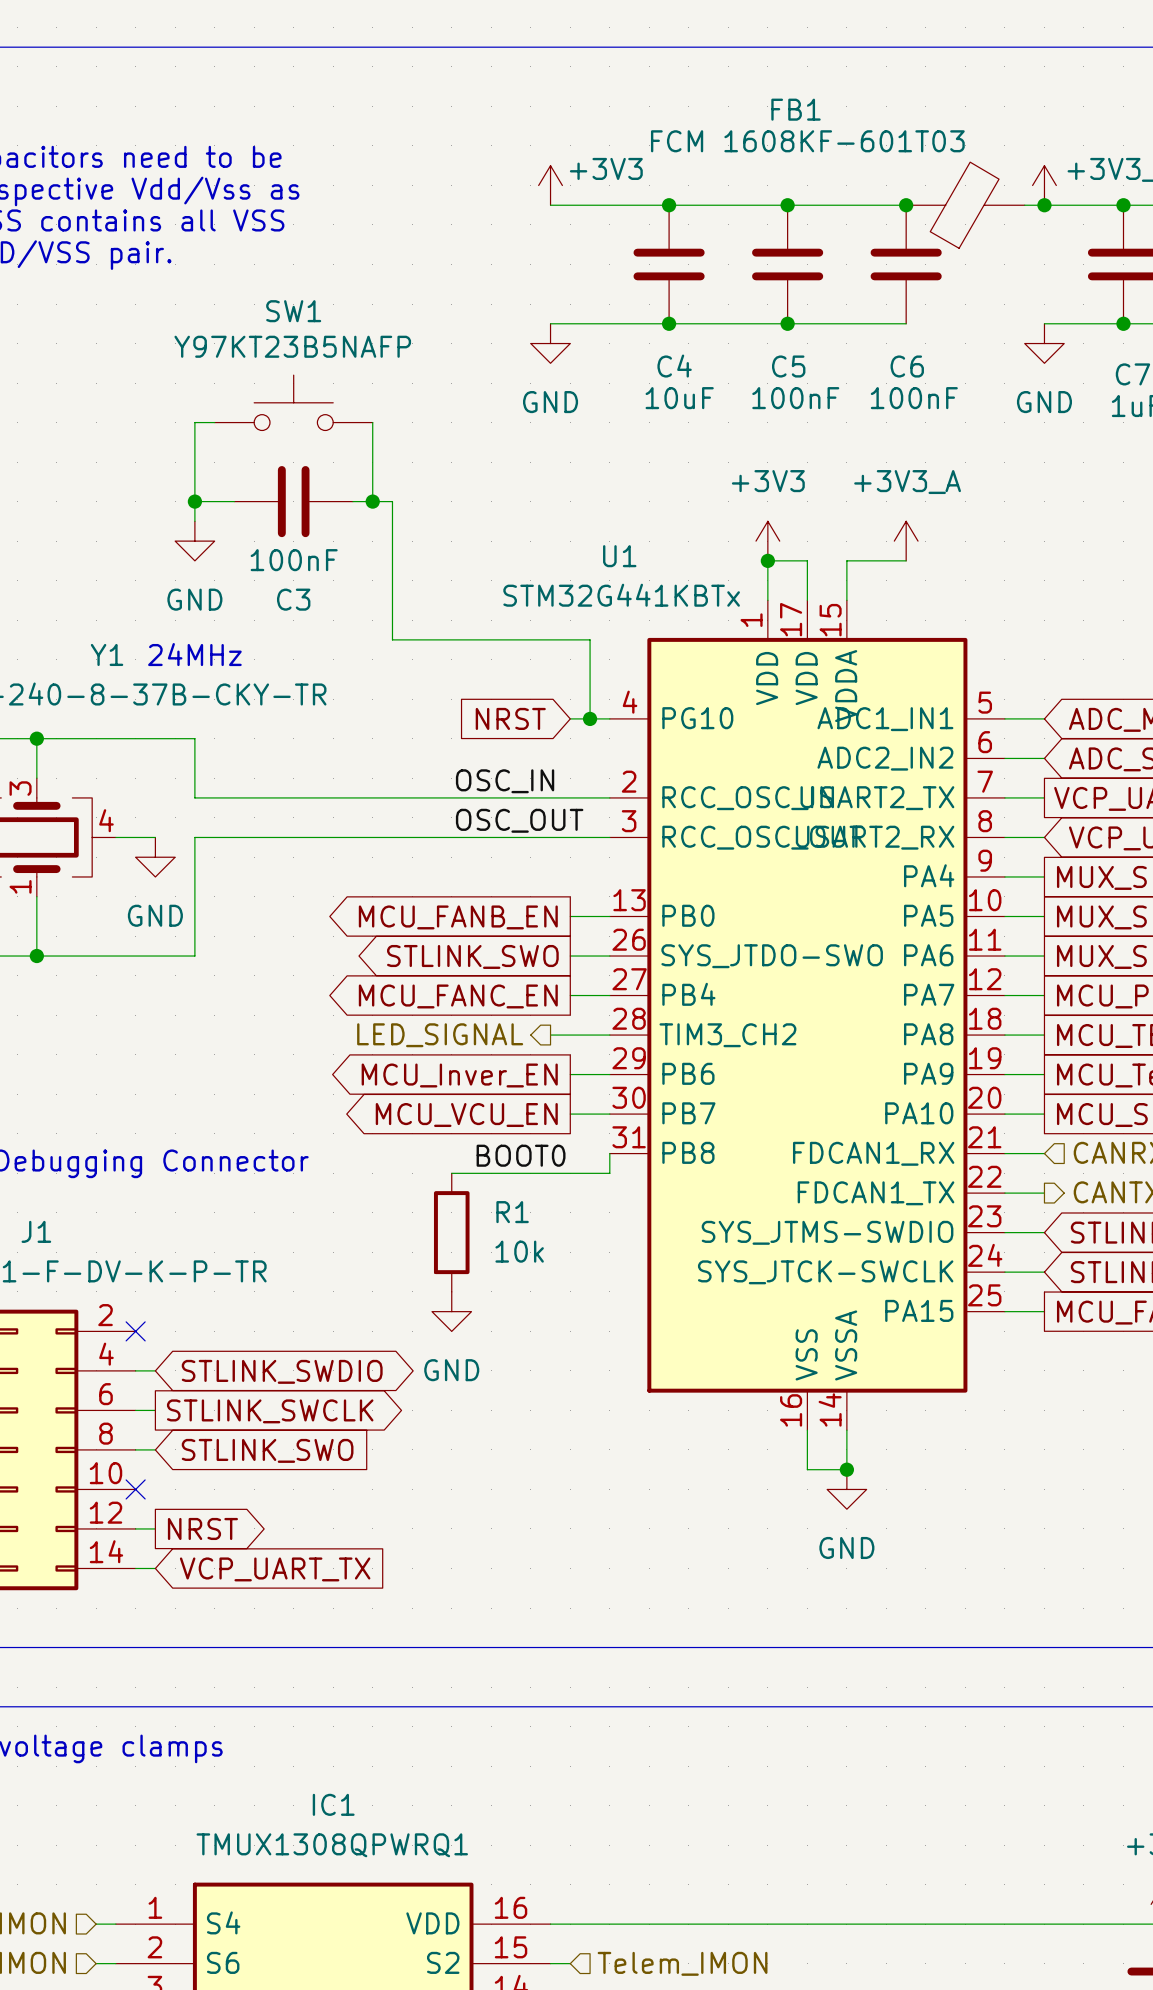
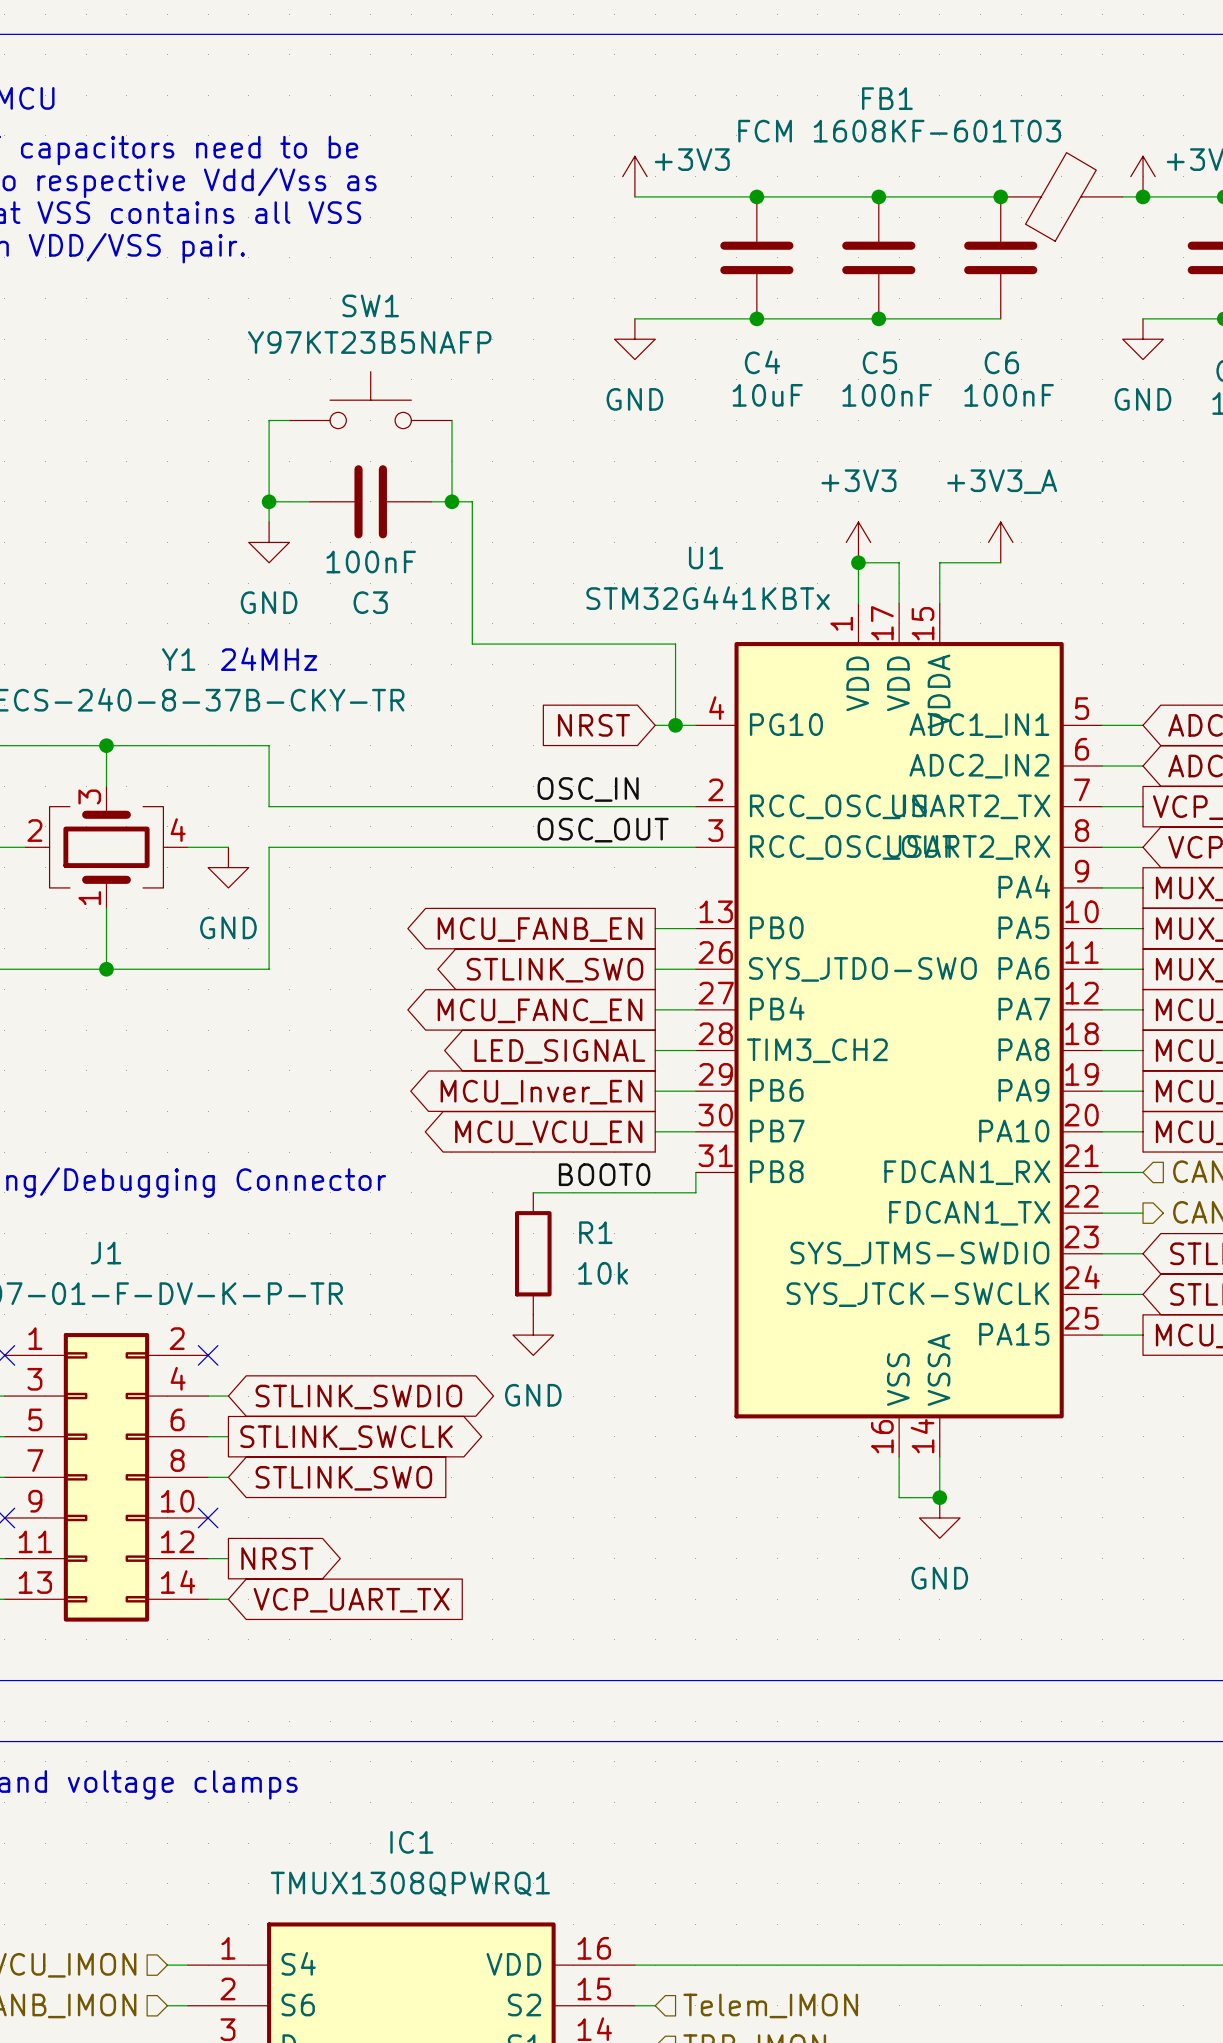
hierarchical label: LED_SIGNAL (440, 1035) -> none
global label: none -> LED_SIGNAL (559, 1051)
wire: (550, 1035) (570, 1035) -> none

